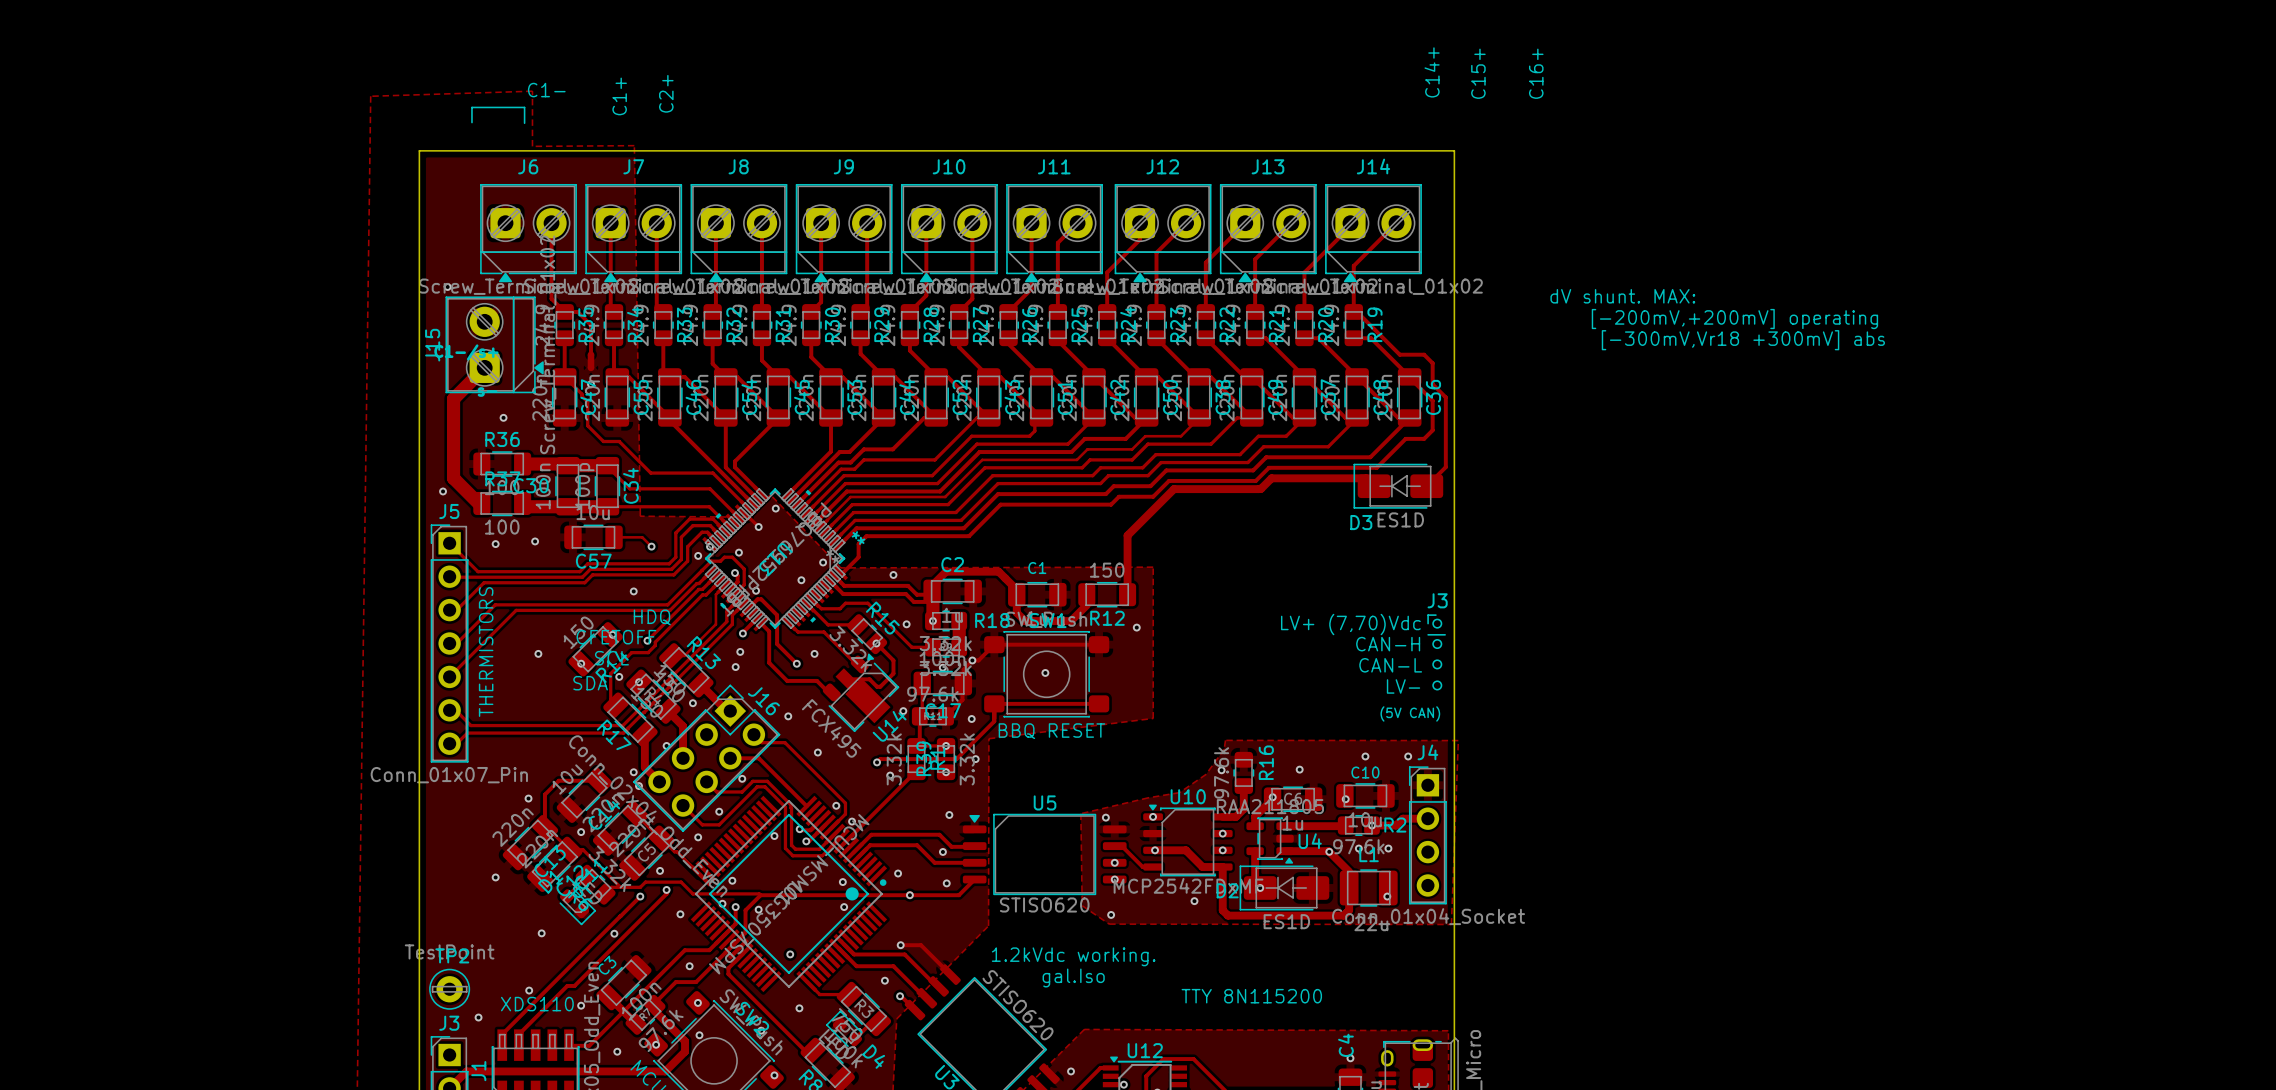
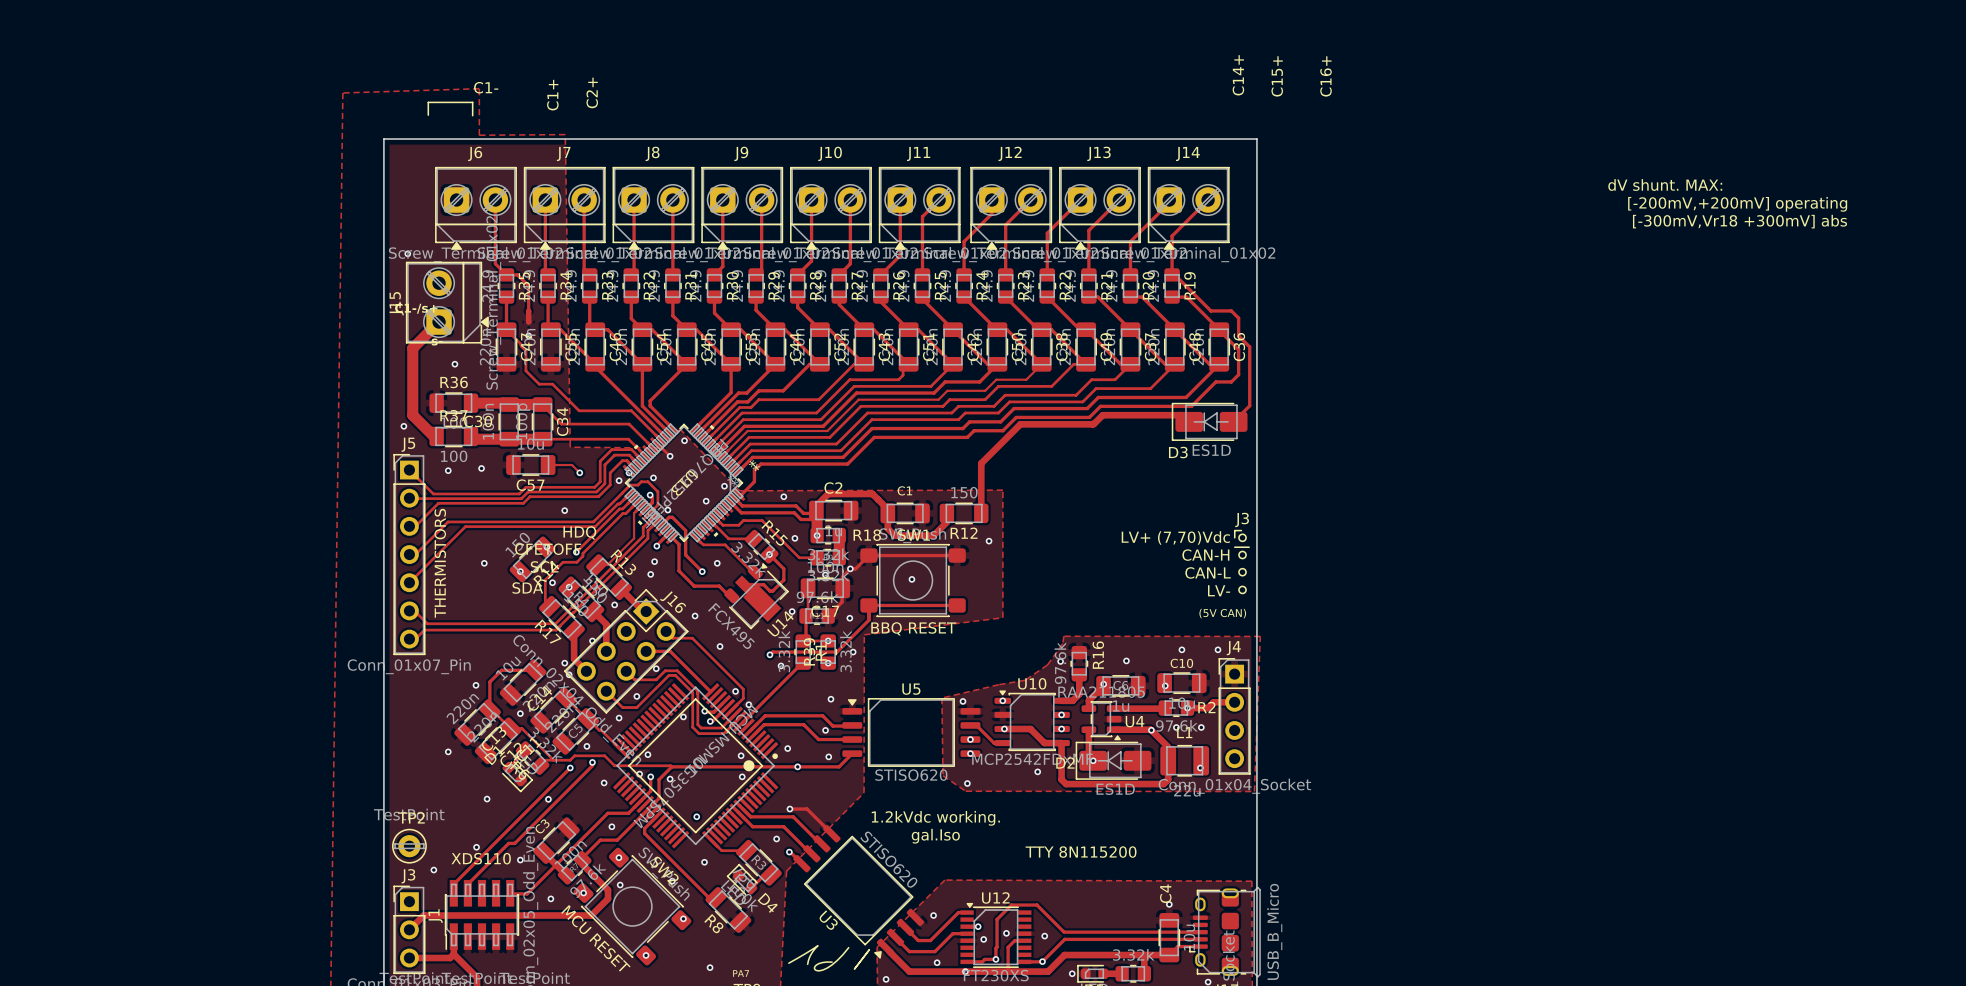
text: none -> dV shunt. MAX: (1665, 185)
text: none -> [-200mV,+200mV] operating (1737, 204)
text: none -> [-300mV,Vr18 +300mV] abs (1739, 221)
text: dV shunt. MAX: (1622, 296) -> none
text: [-200mV,+200mV] operating (1734, 319) -> none
text: [-300mV,Vr18 +300mV] abs (1743, 340) -> none

